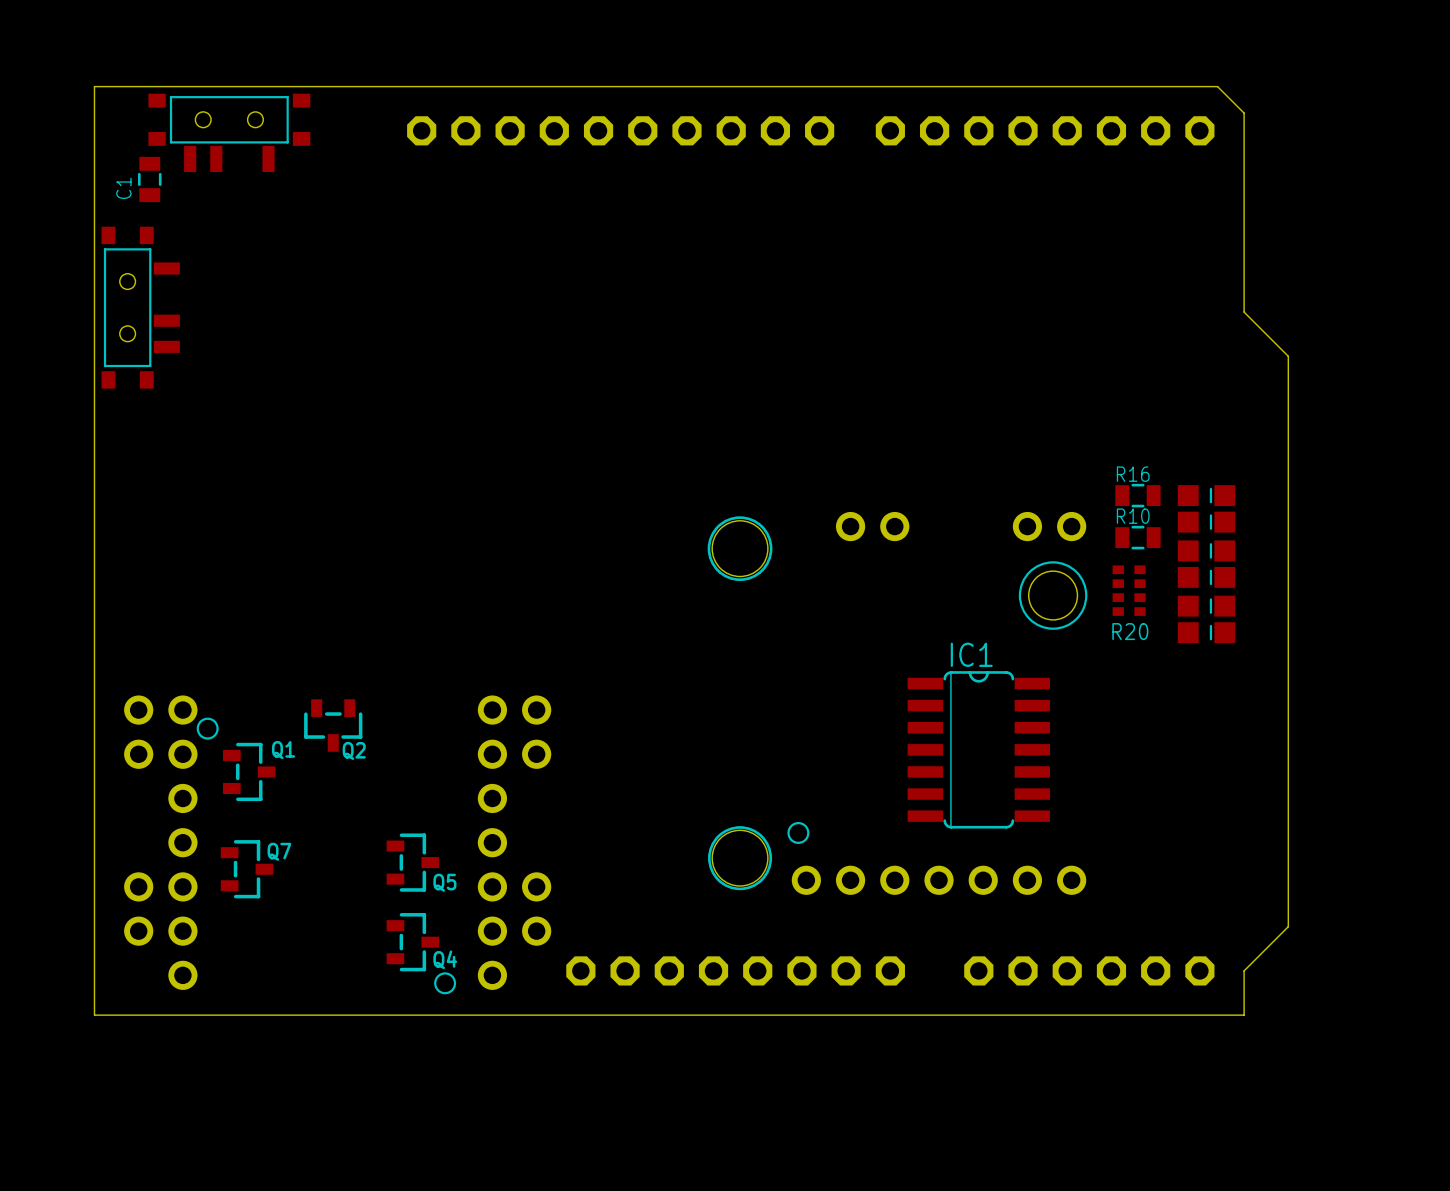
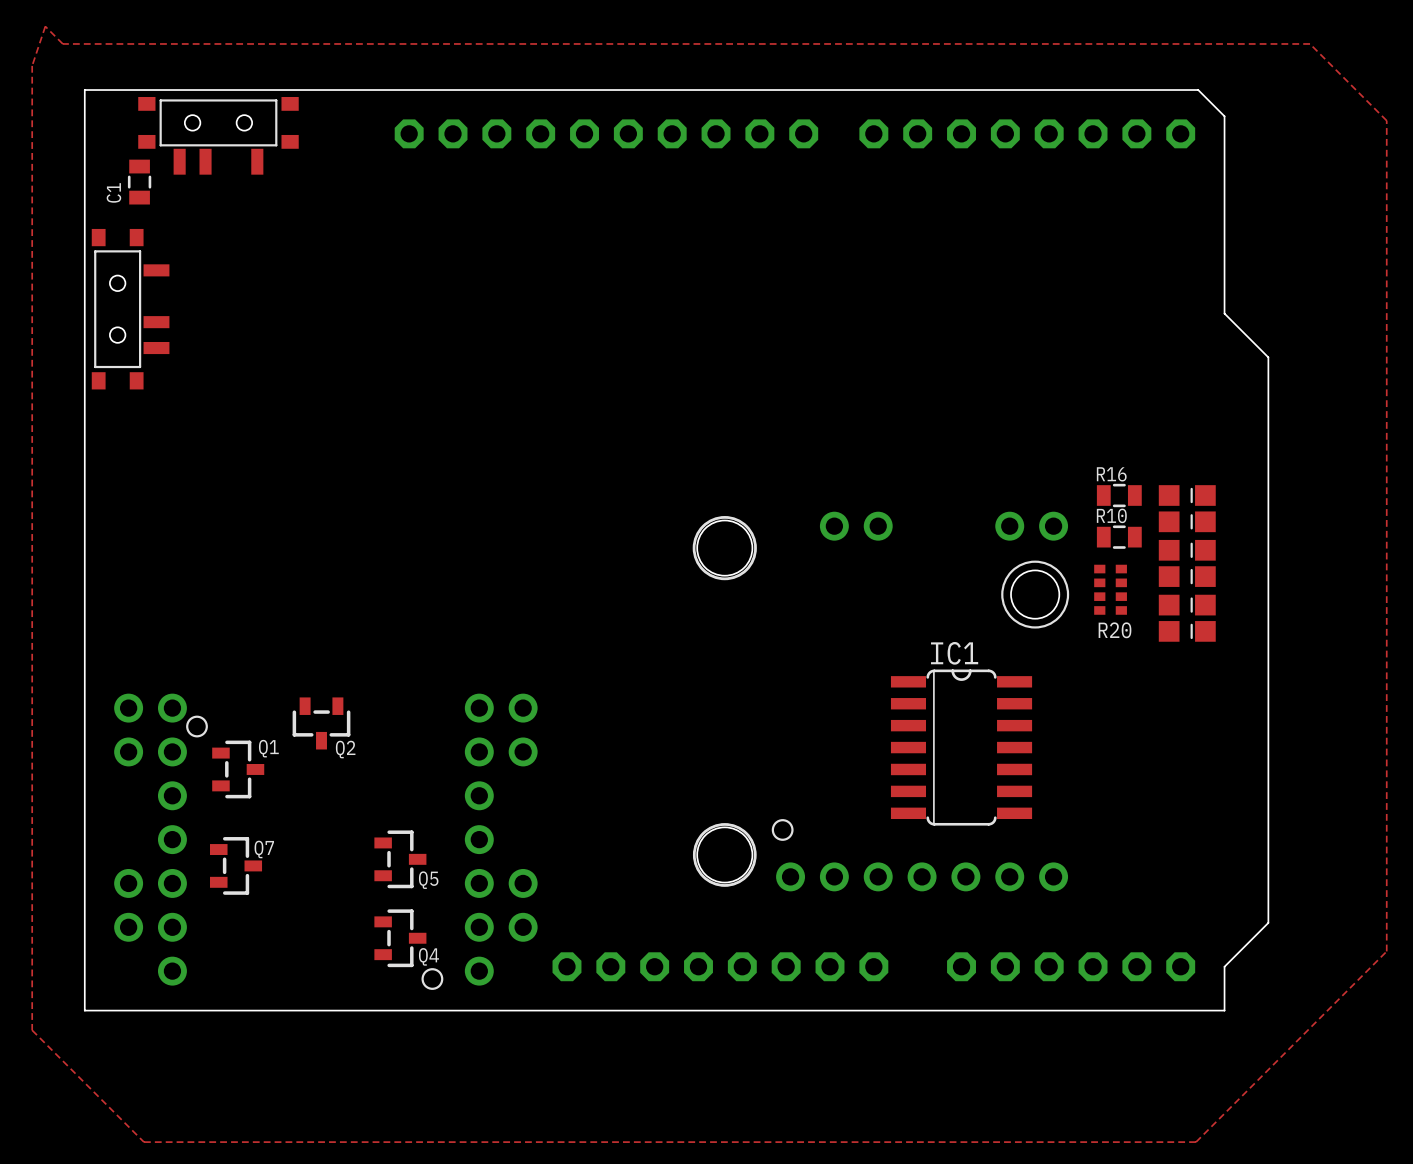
zone outline: none -> (45, 26) (62, 43) (1310, 43) (1386, 120) (1386, 951) (1196, 1142) (143, 1142) (32, 1030) (32, 65) (45, 26)

